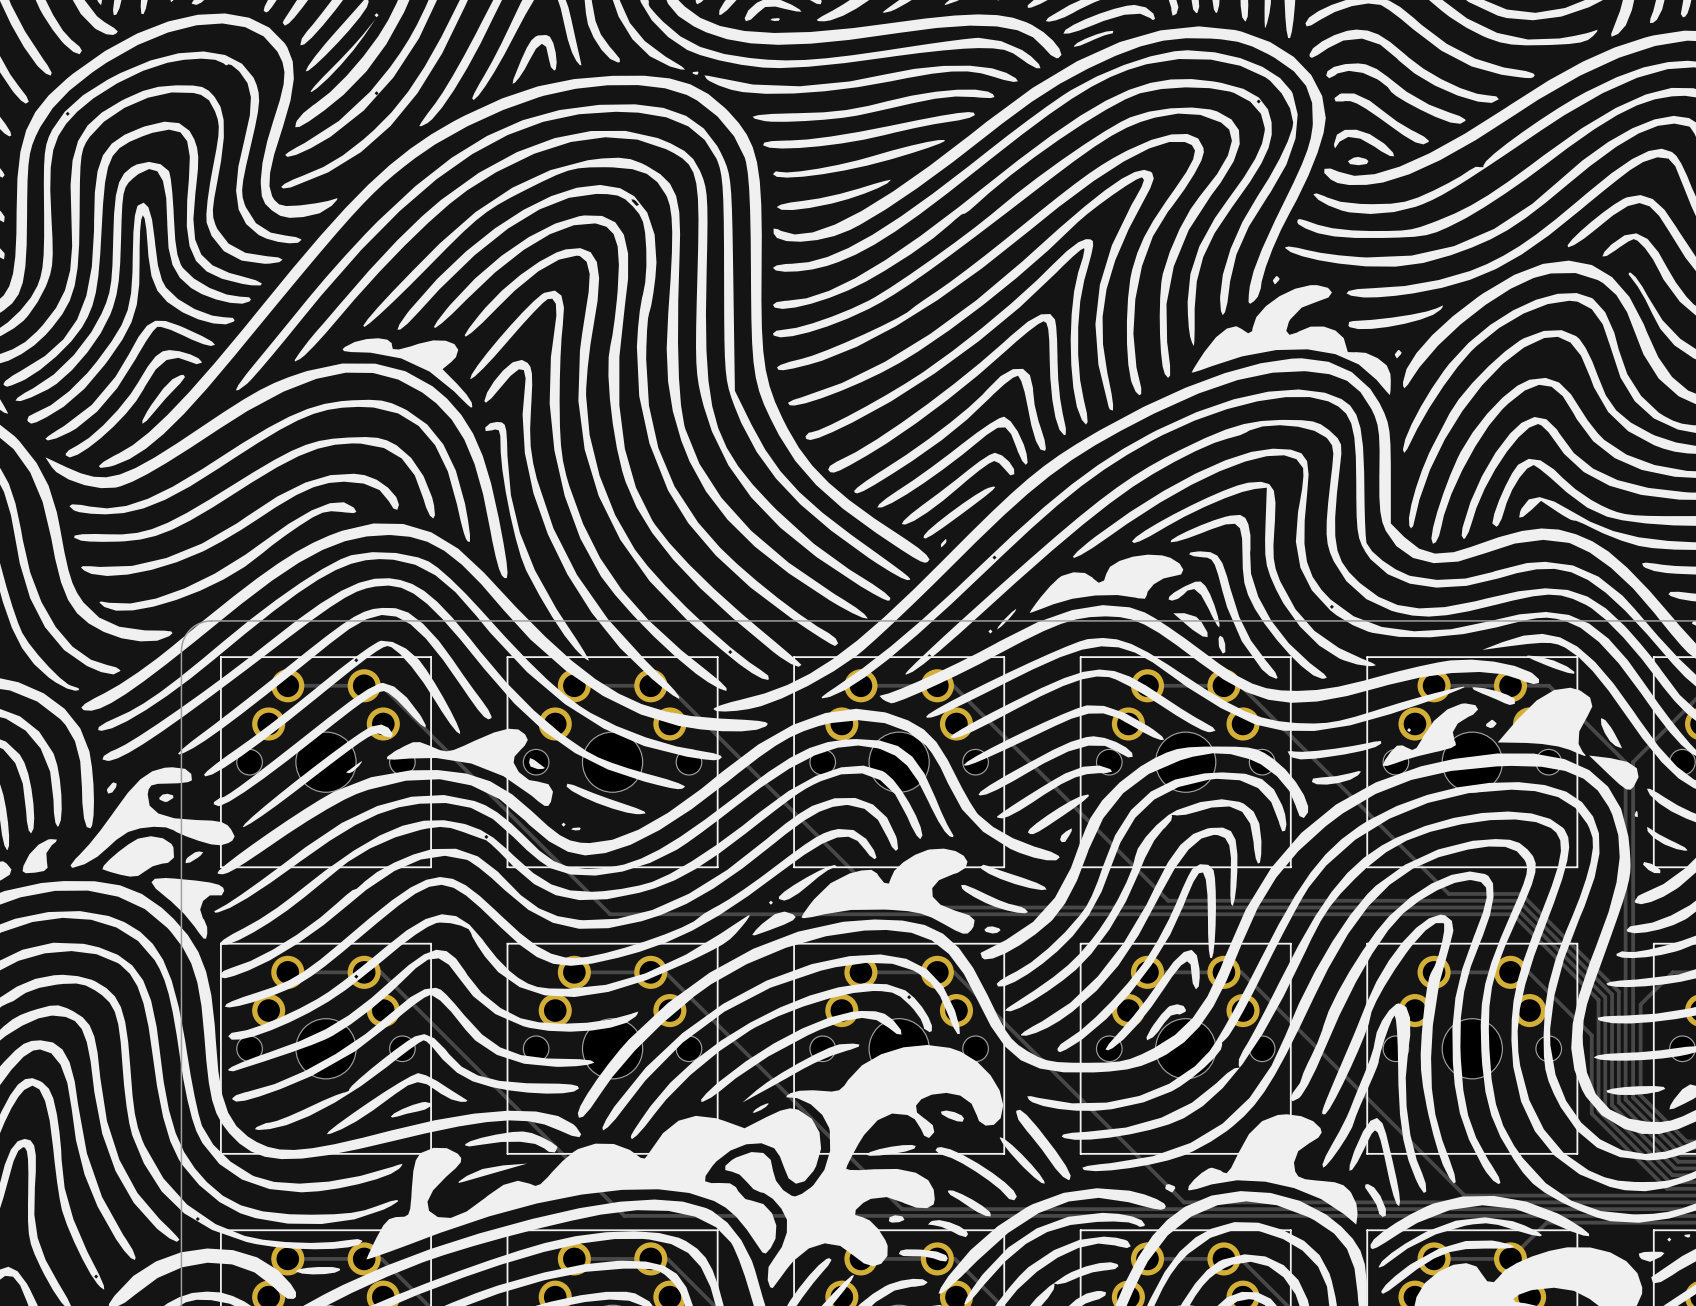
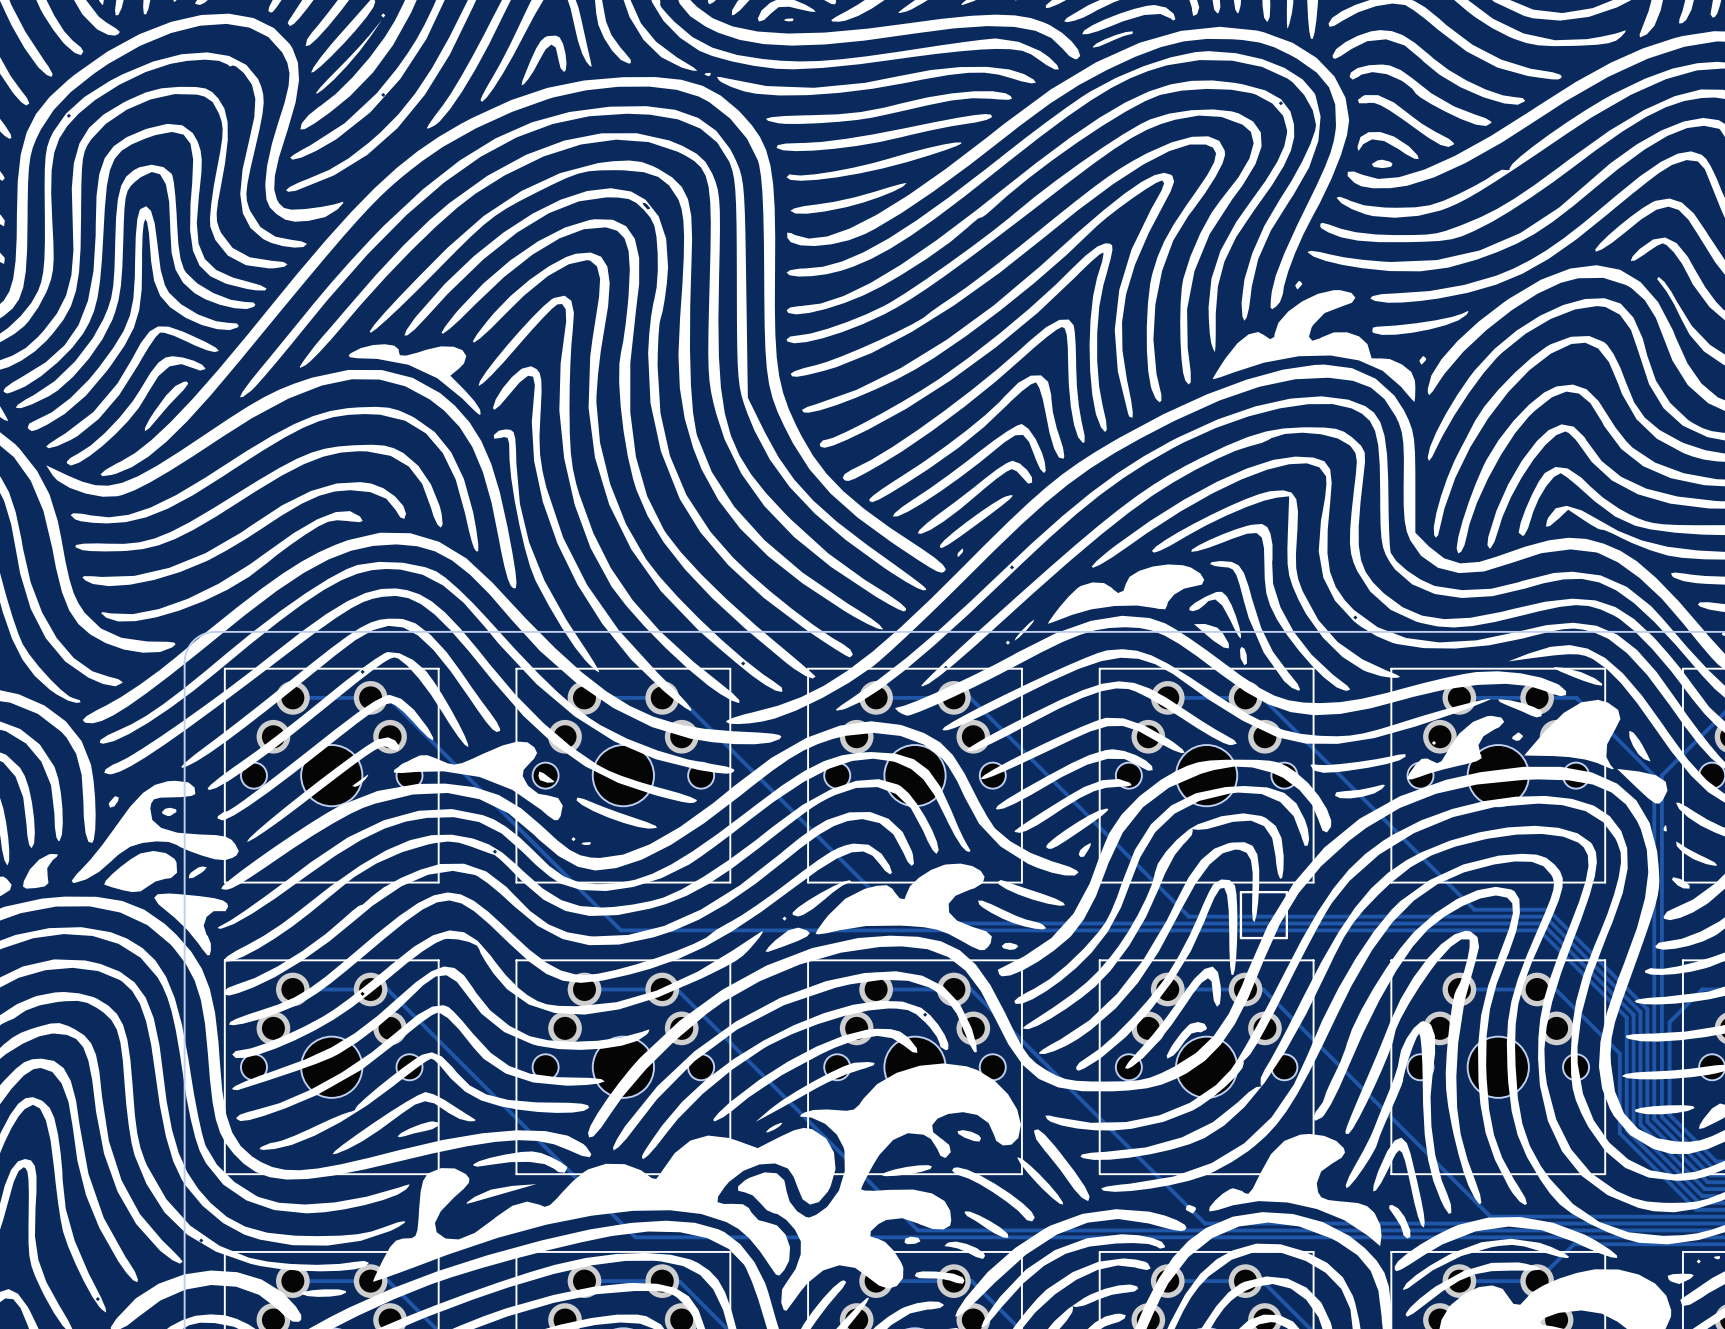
line: none -> (1240, 892) (1286, 892) (1286, 938) (1240, 938) (1240, 892)

